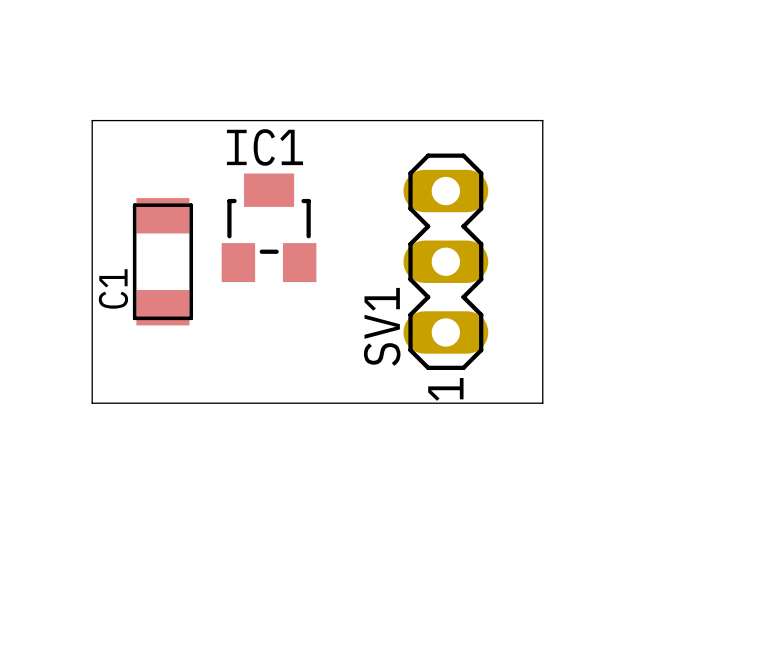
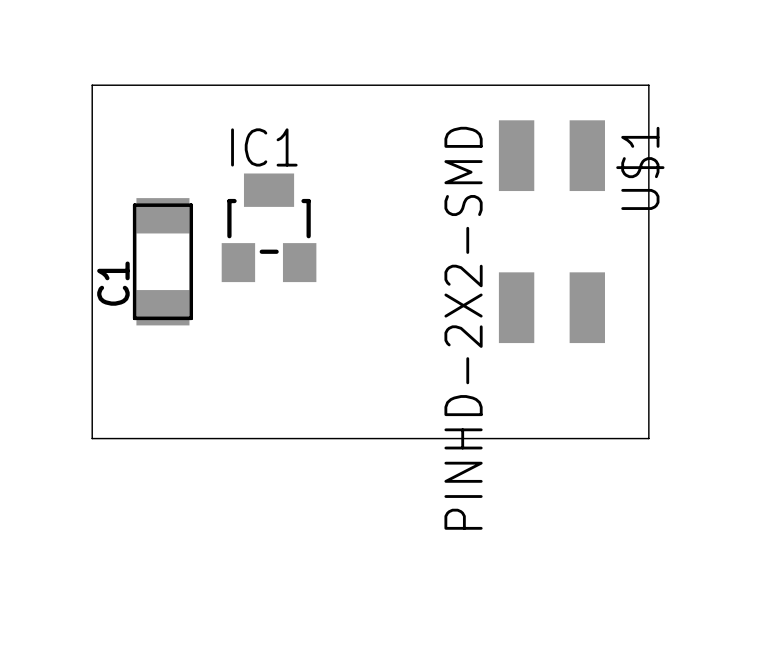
board edge: (92, 120) (542, 120) (542, 403) (92, 403) -> (92, 120) (92, 85) (648, 85) (648, 438) (92, 438) (92, 403)
U$1: none -> PINHD-2X2-SMD (551, 231)
SV1: (445, 261) -> none

